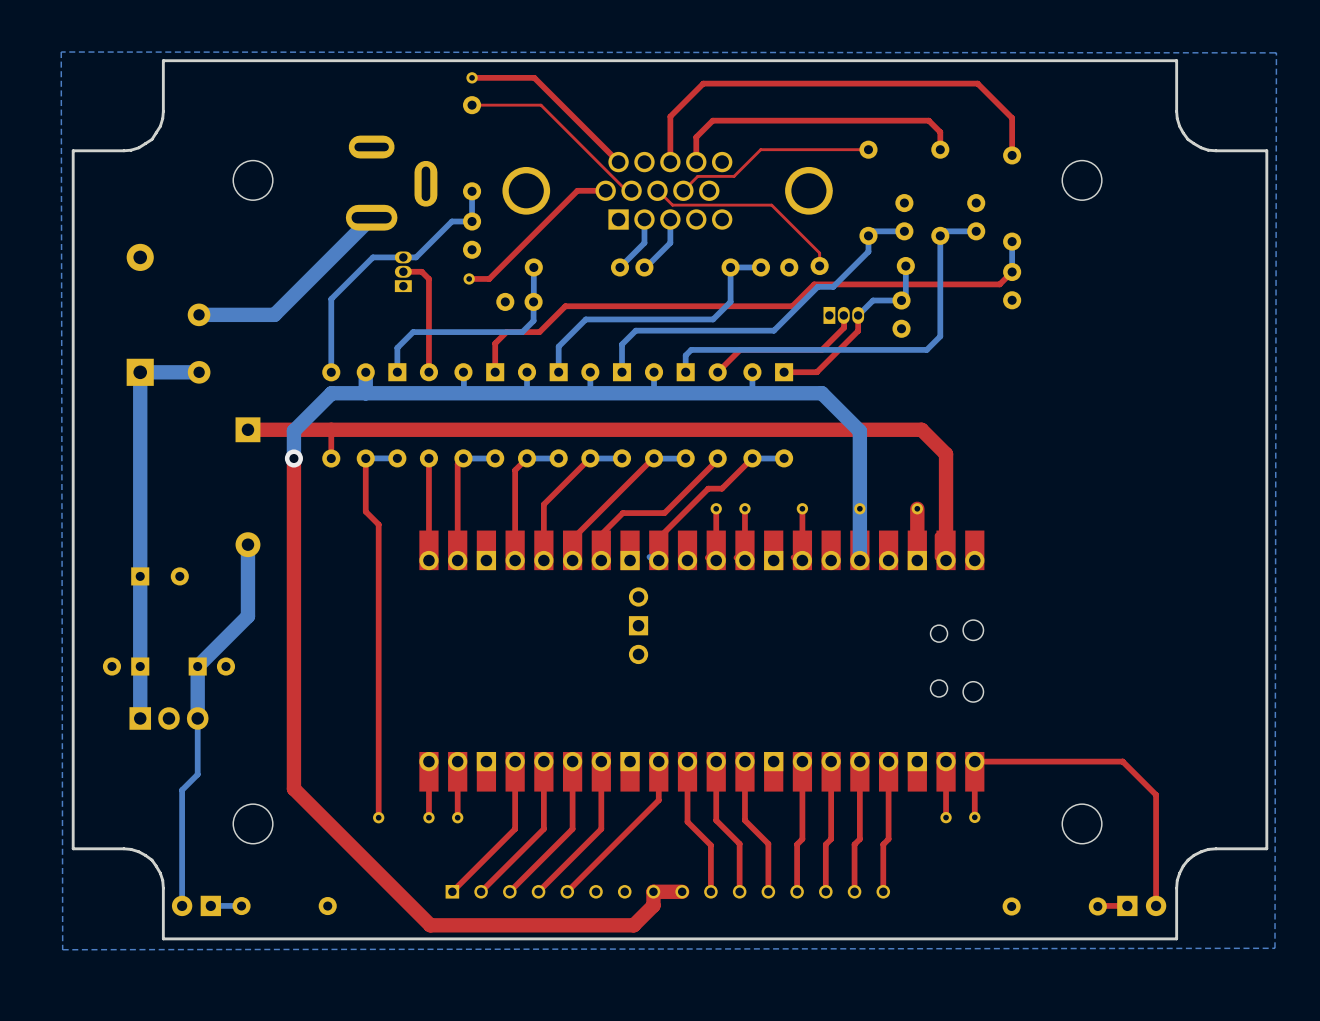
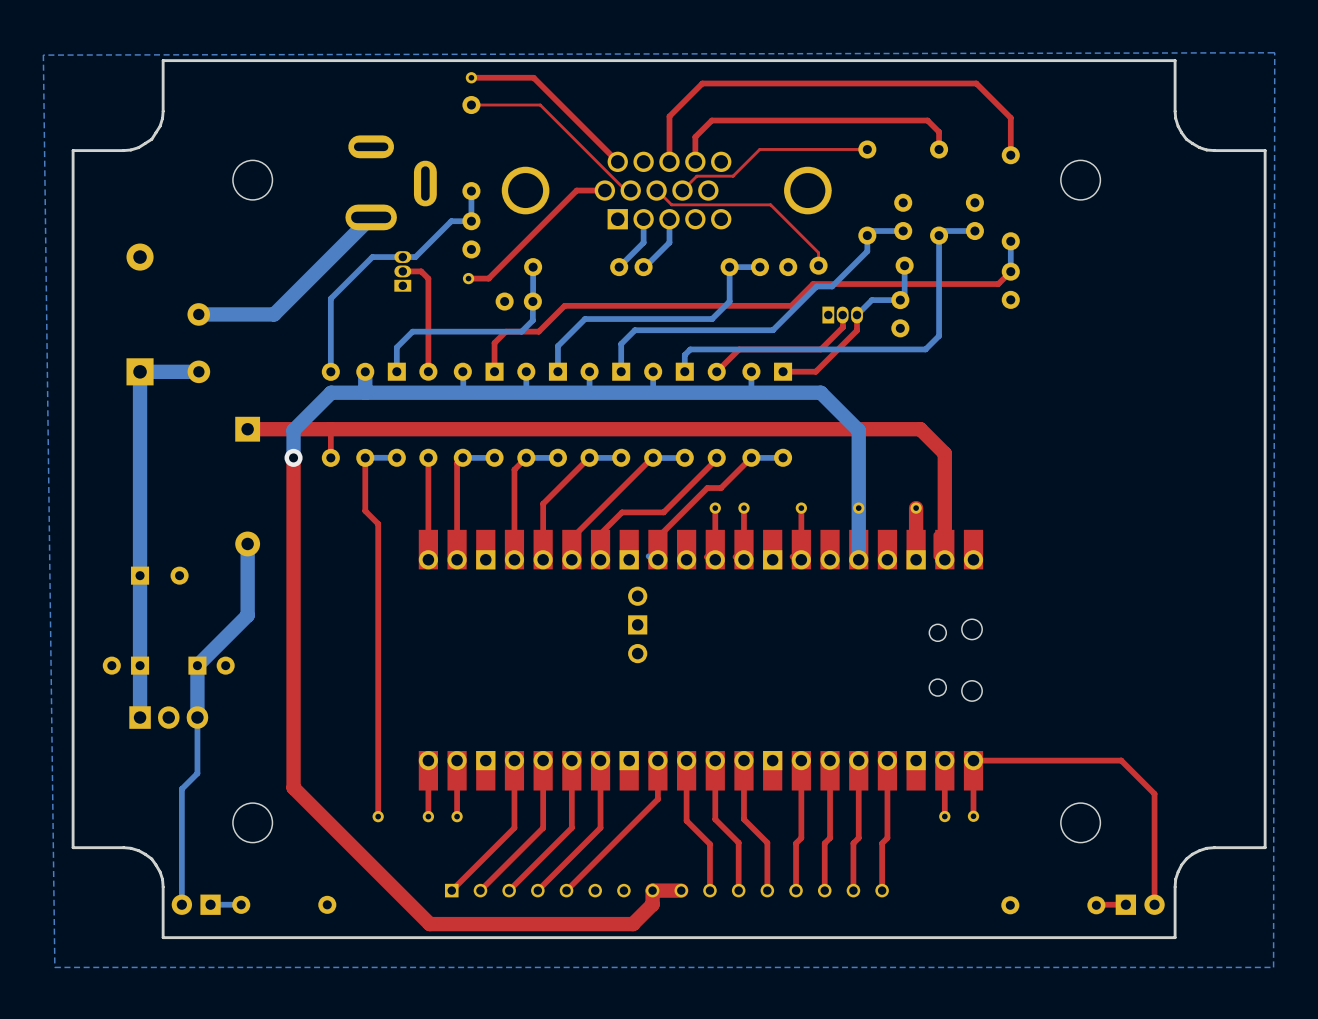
bottom zone outline: (1276, 52) (1274, 948) (62, 949) (61, 52) (1275, 52) -> (1274, 52) (1273, 967) (54, 967) (43, 55) (1273, 52)

